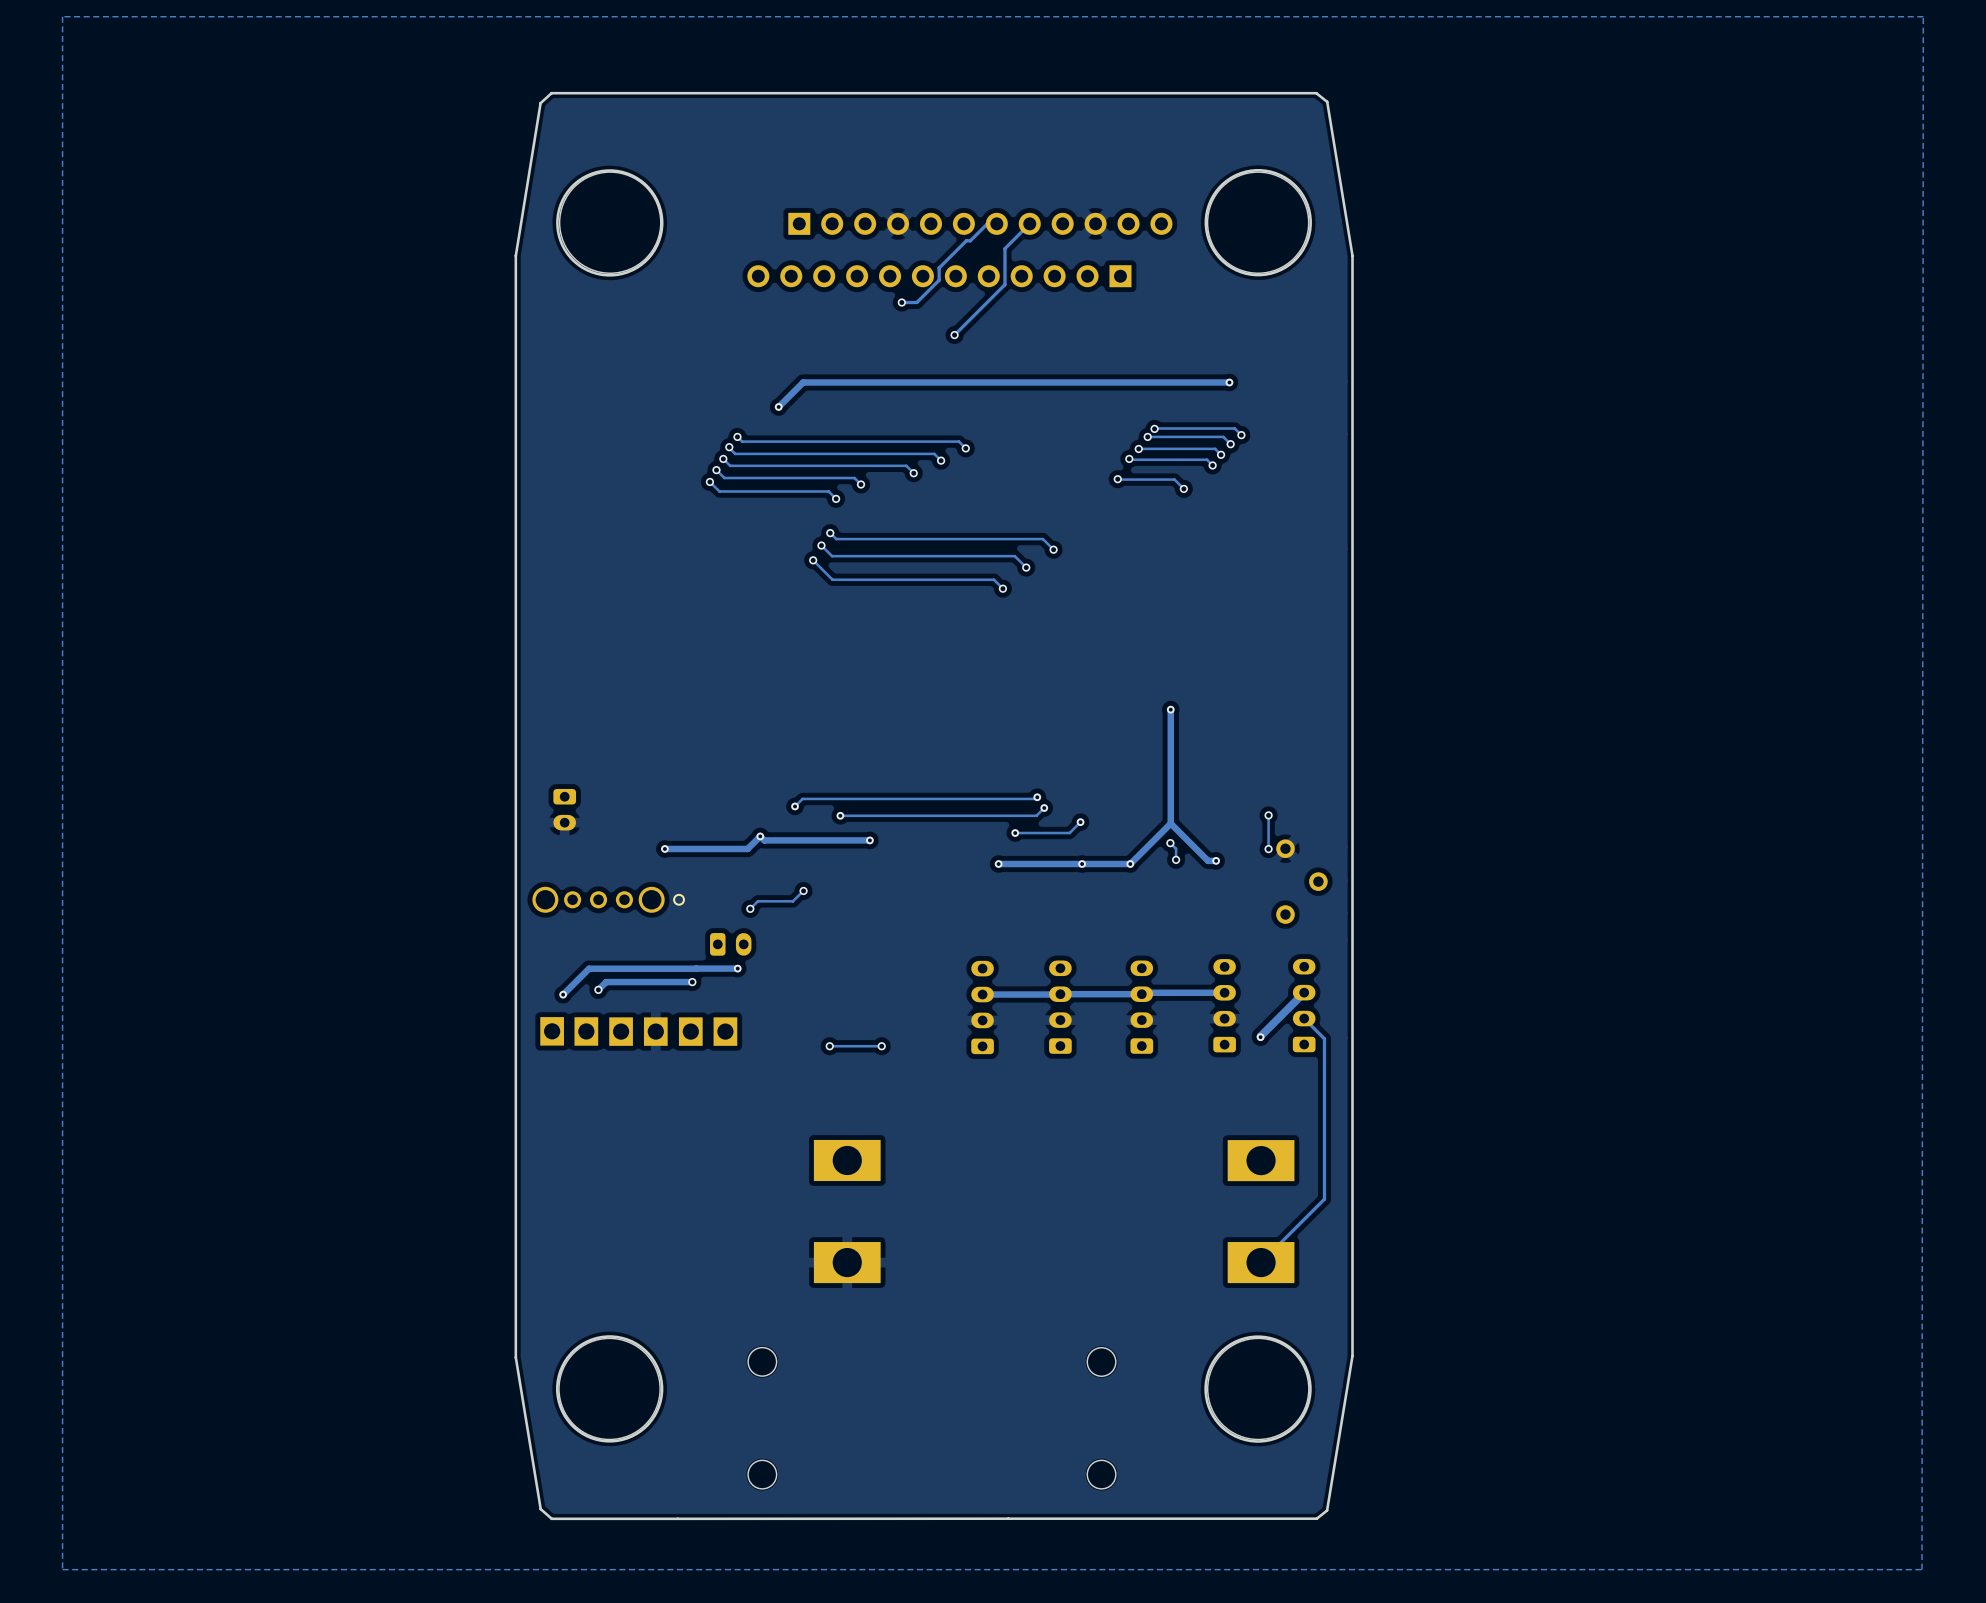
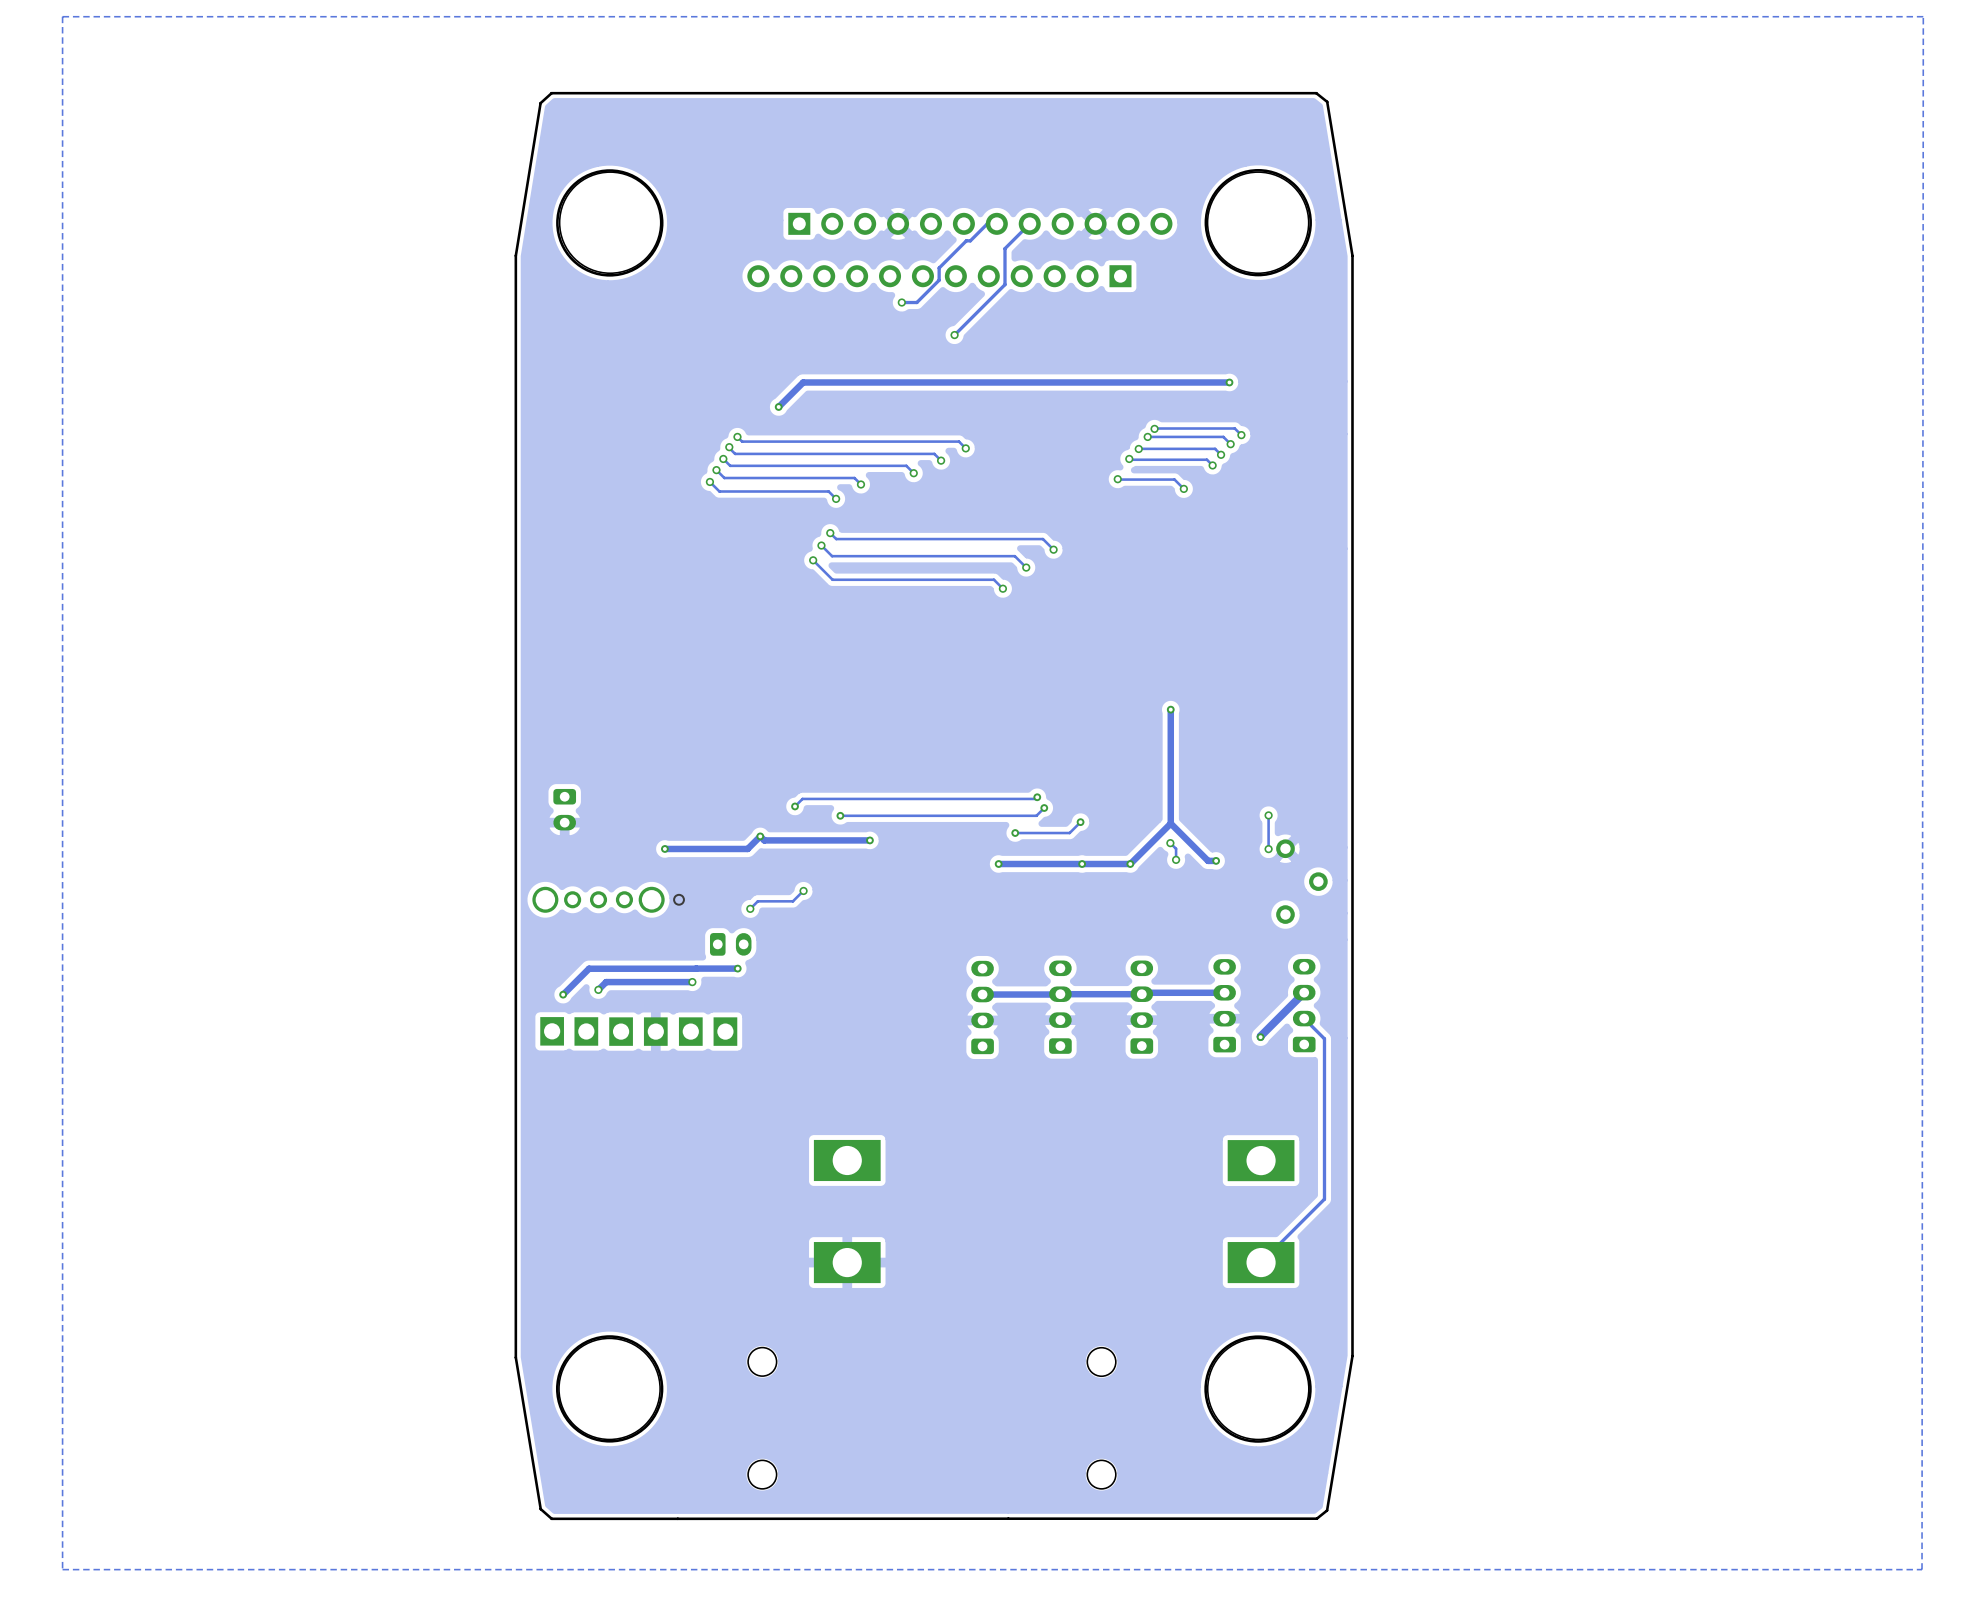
via: (829, 1046) -> none
track: (881, 1046) (829, 1046) -> none
via: (881, 1046) -> none

